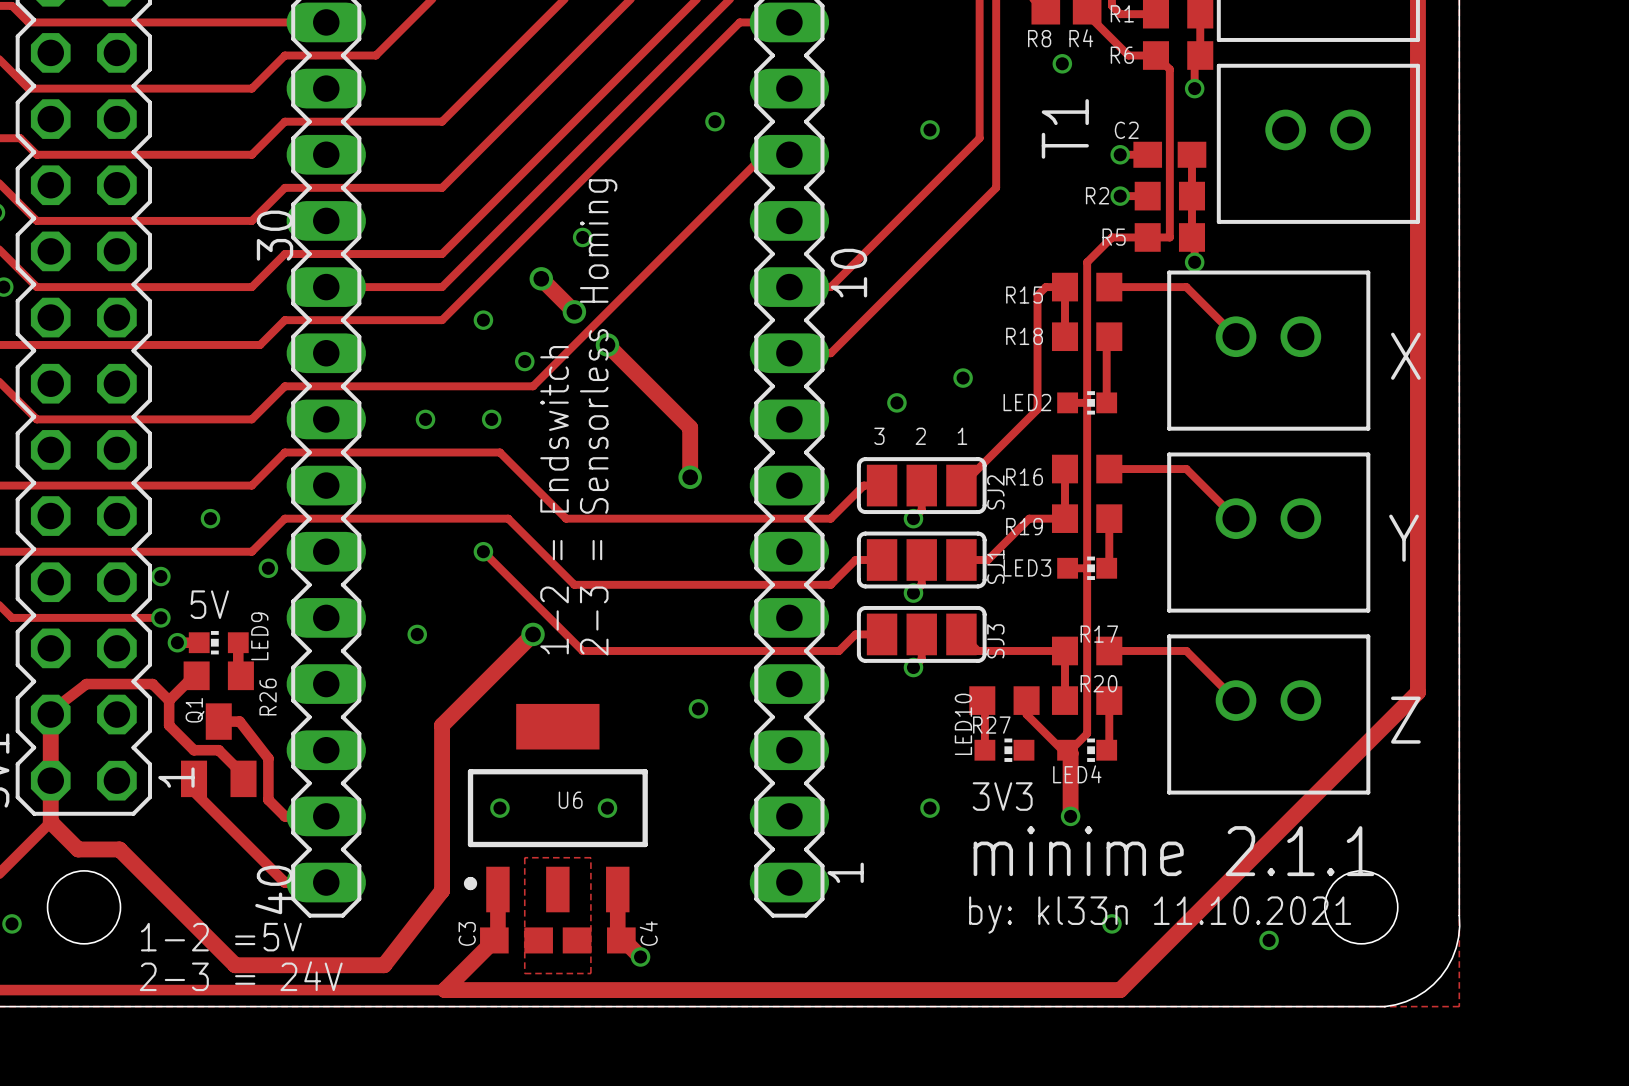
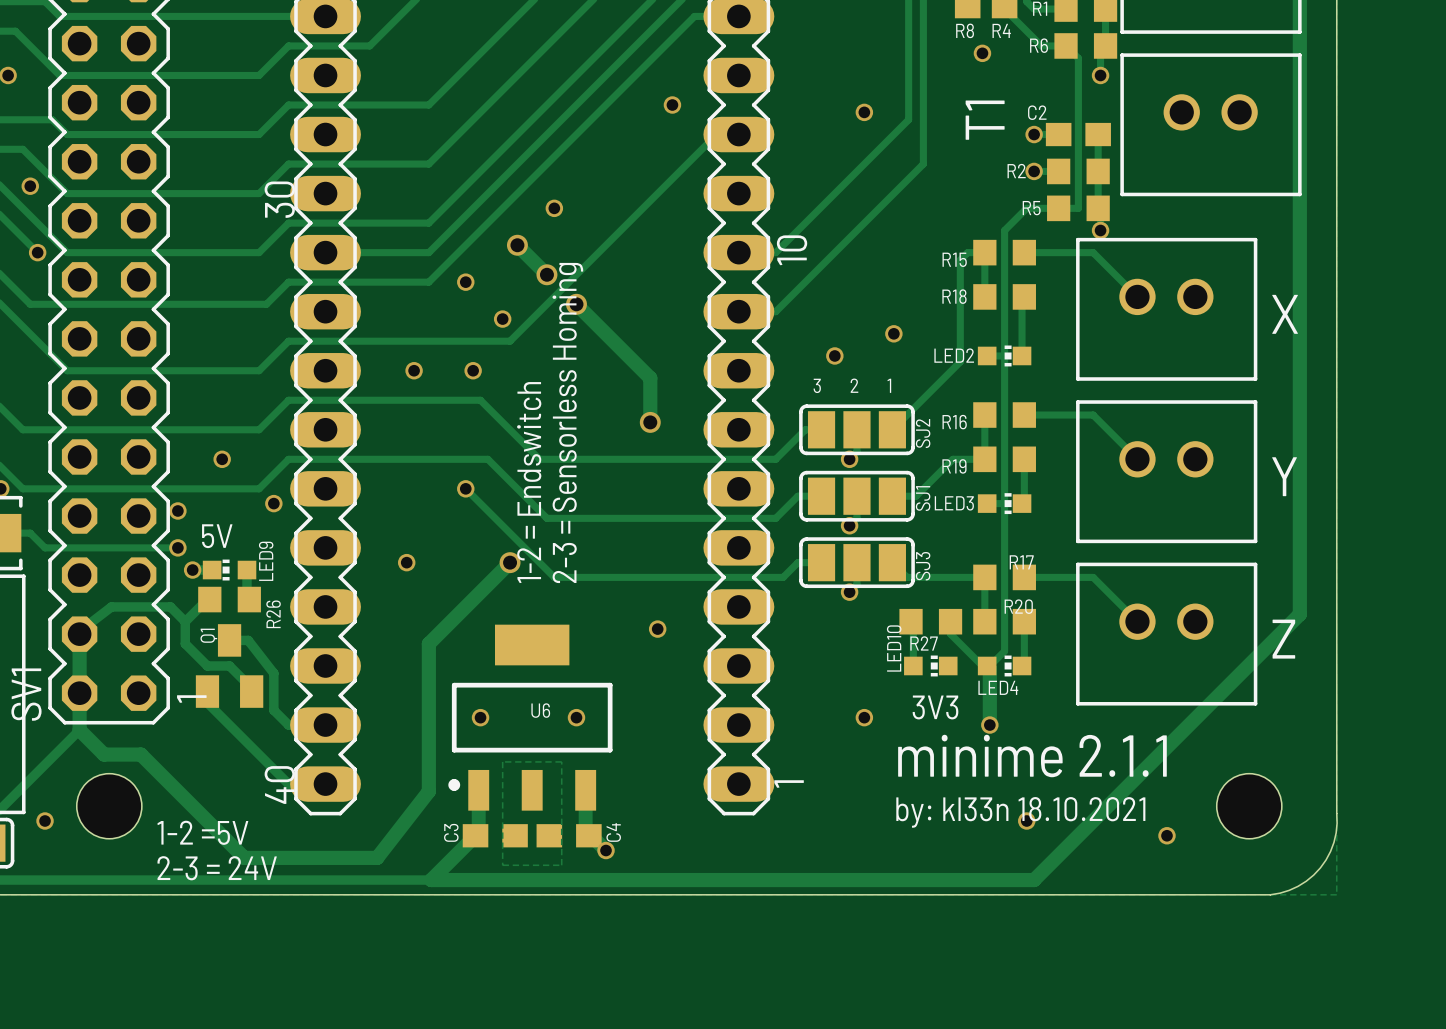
text: by: kl33n 11.10.2021 (1160, 915) -> by: kl33n 18.10.2021 (1020, 812)

